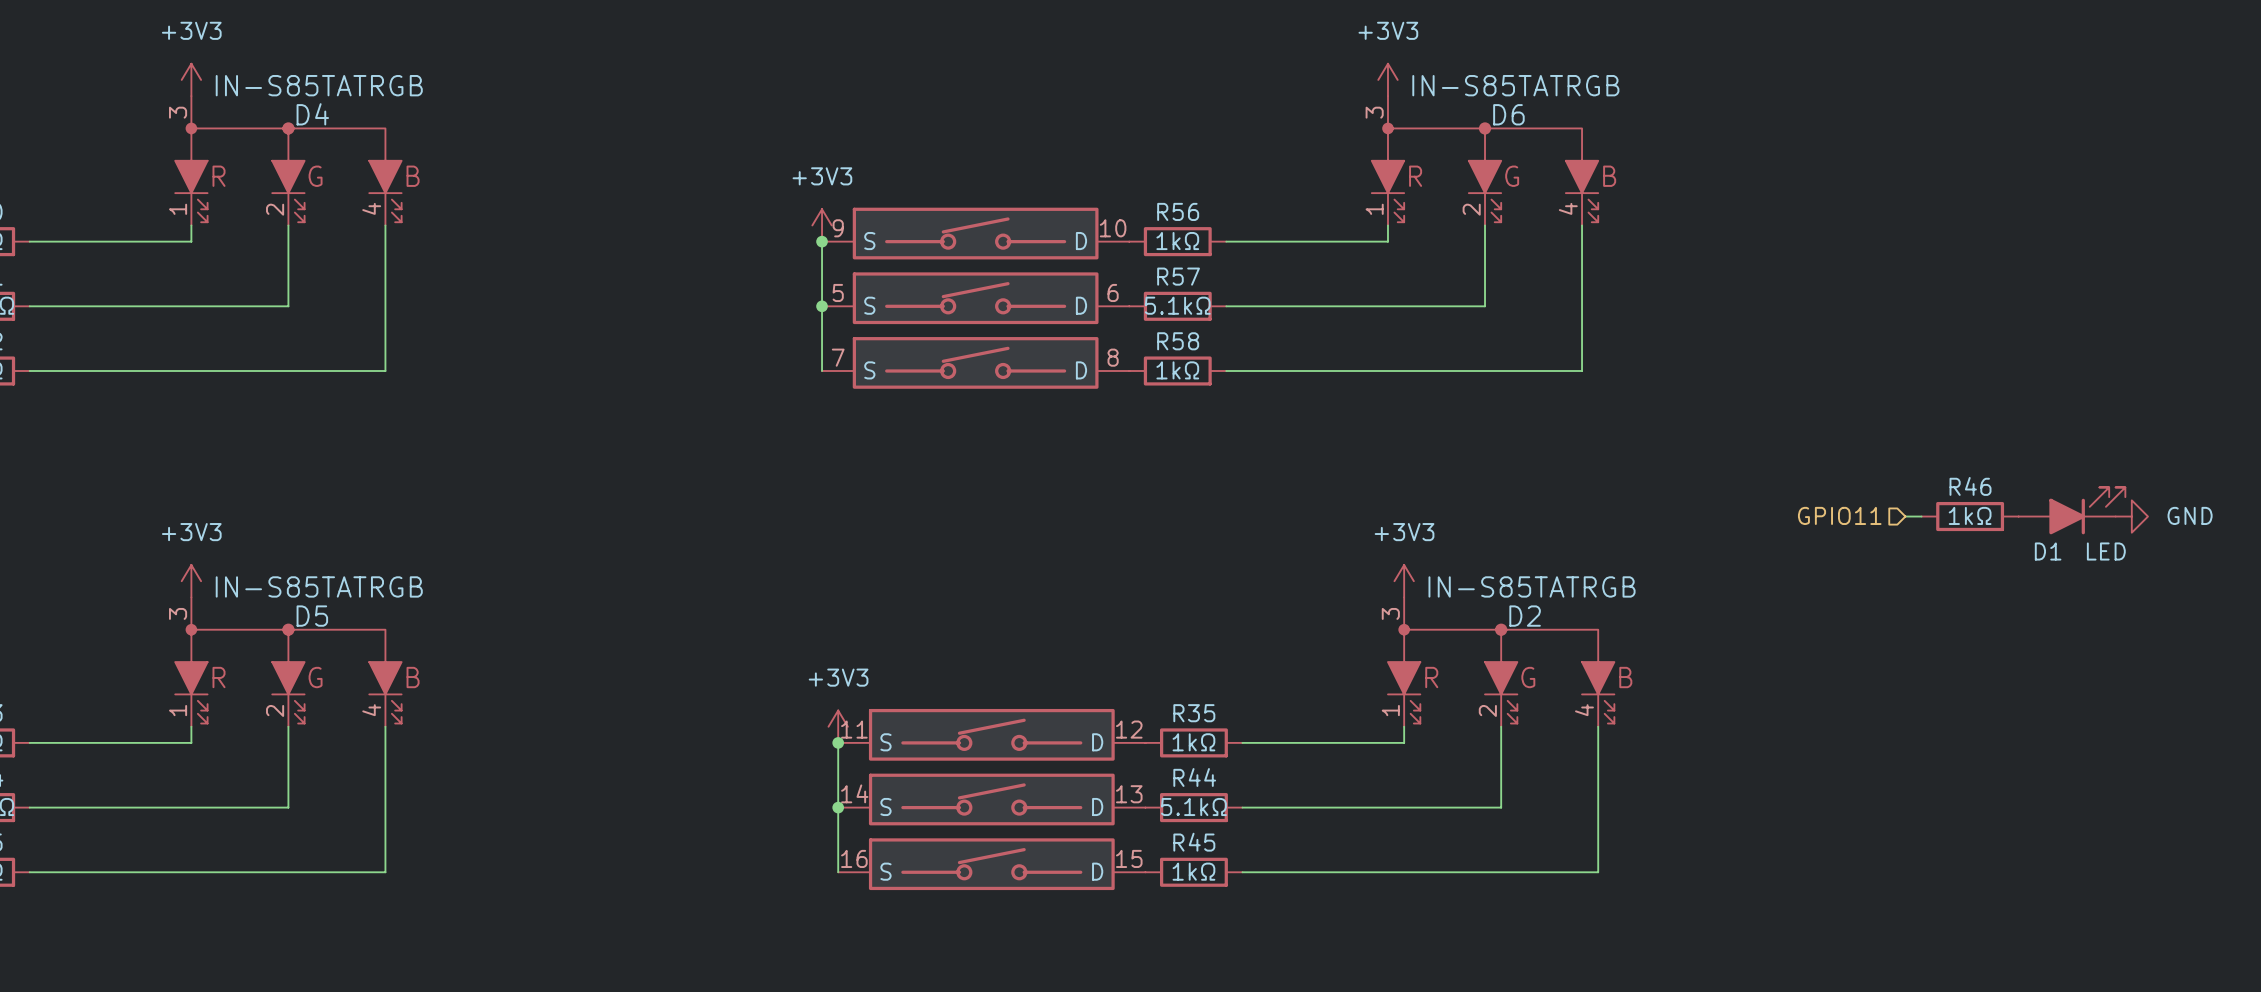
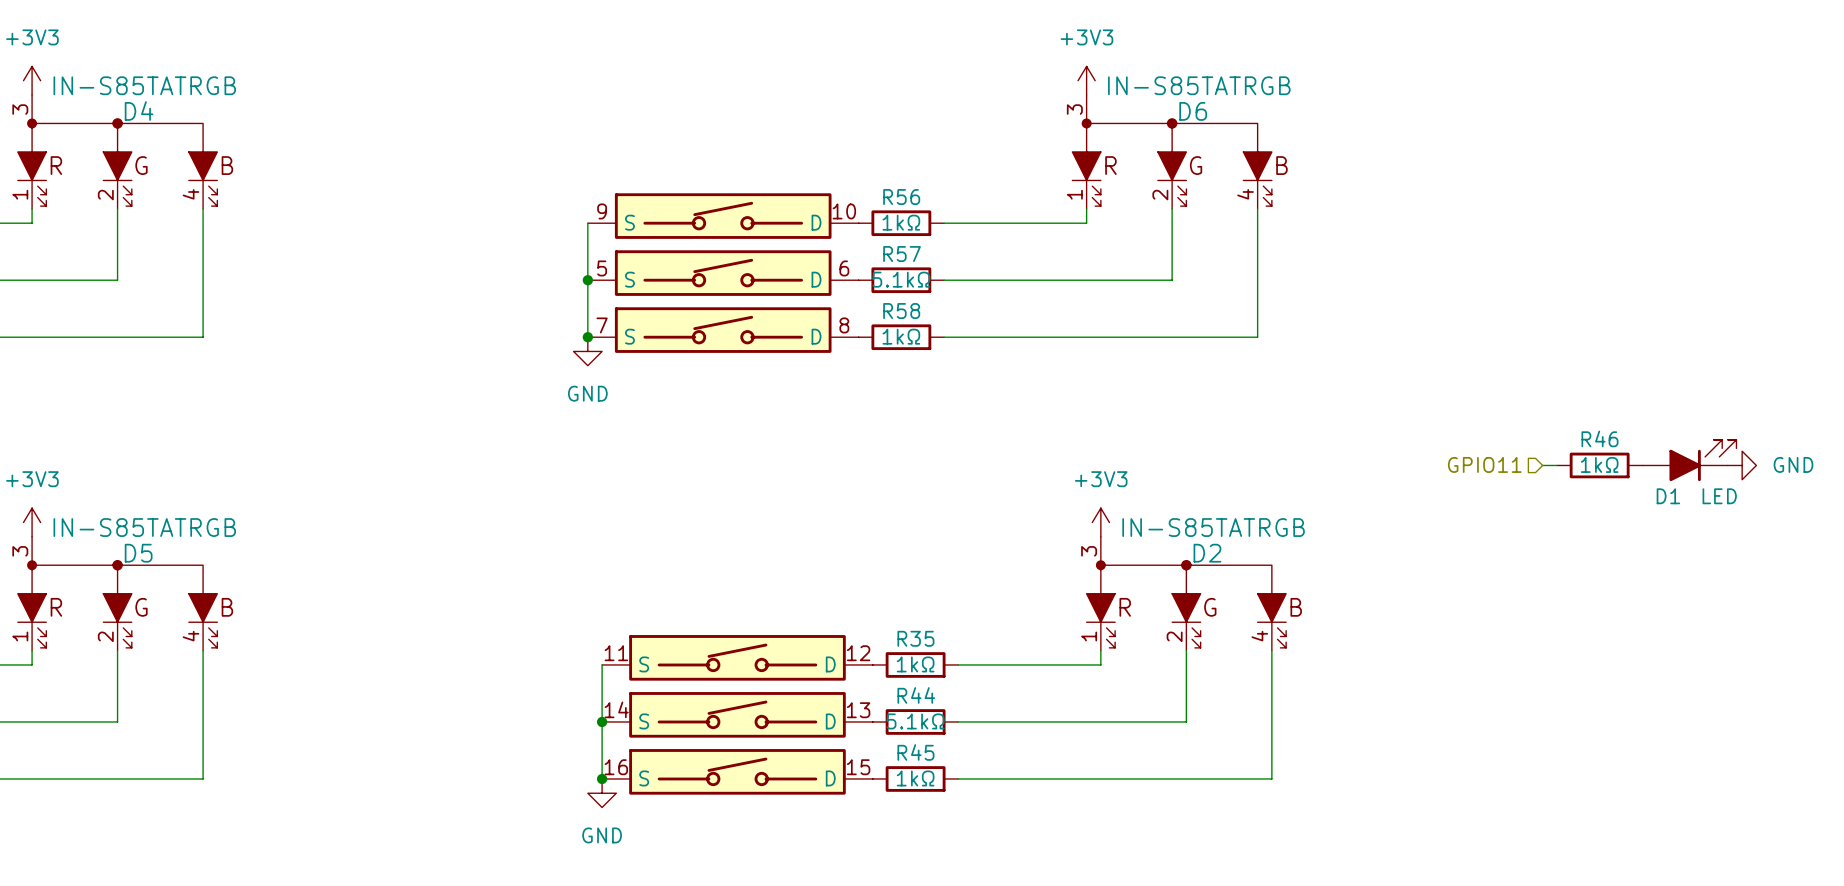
power symbol: +3V3 (822, 225) -> none
junction: (822, 241) -> none
junction: none -> (587, 337)
power symbol: none -> GND (587, 351)
power symbol: +3V3 (838, 726) -> none
junction: (838, 742) -> none
junction: none -> (602, 778)
power symbol: none -> GND (602, 793)

